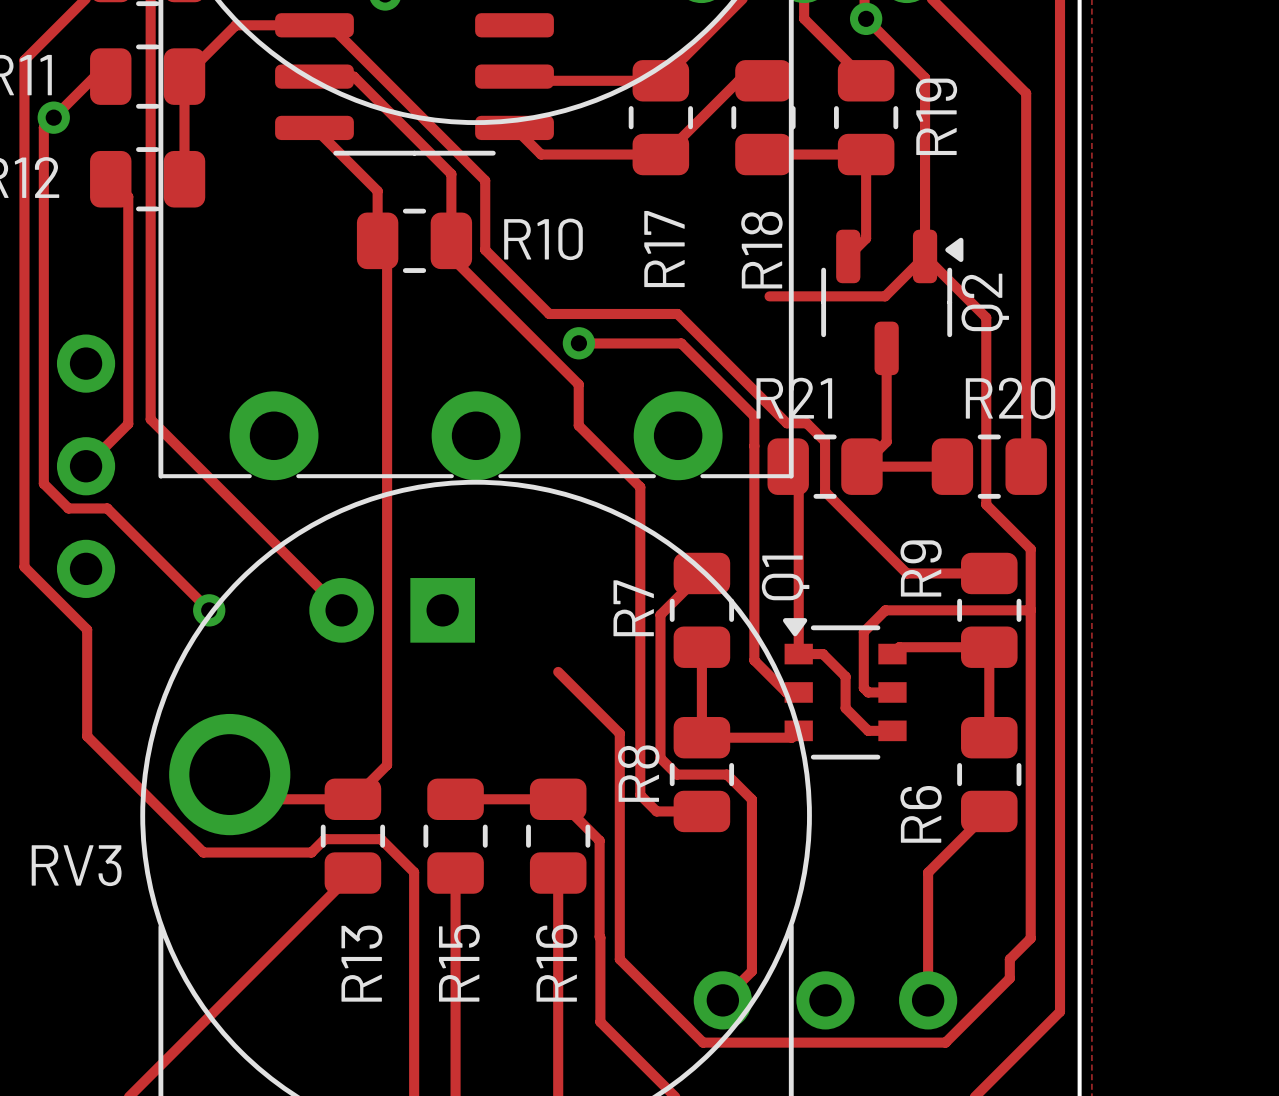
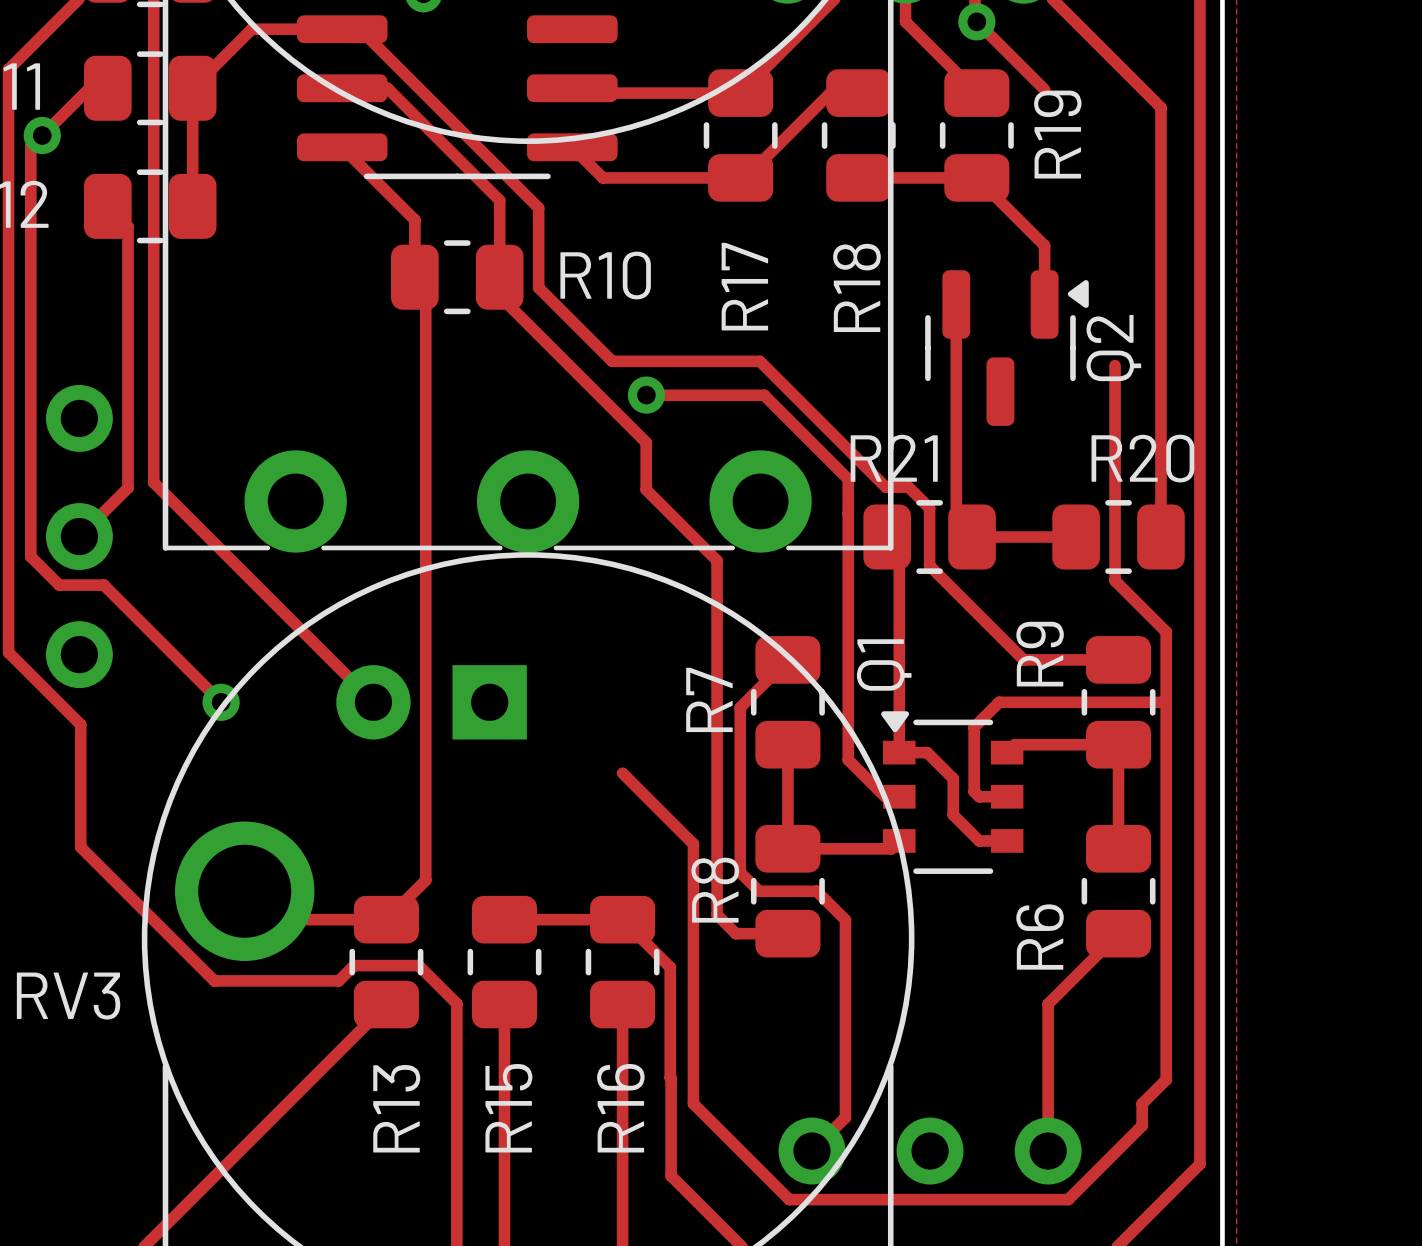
track: (925, 77) (925, 213) -> none
track: (866, 154) (866, 238) (848, 256) -> (976, 177) (1044, 245)
Q2 footprint: [821, 229, 964, 376] -> [925, 270, 1089, 426]
track: (769, 296) (885, 296) (925, 256) (986, 317) -> none
track: (886, 348) (886, 441) (861, 466) -> (956, 304) (956, 521) (972, 537)

